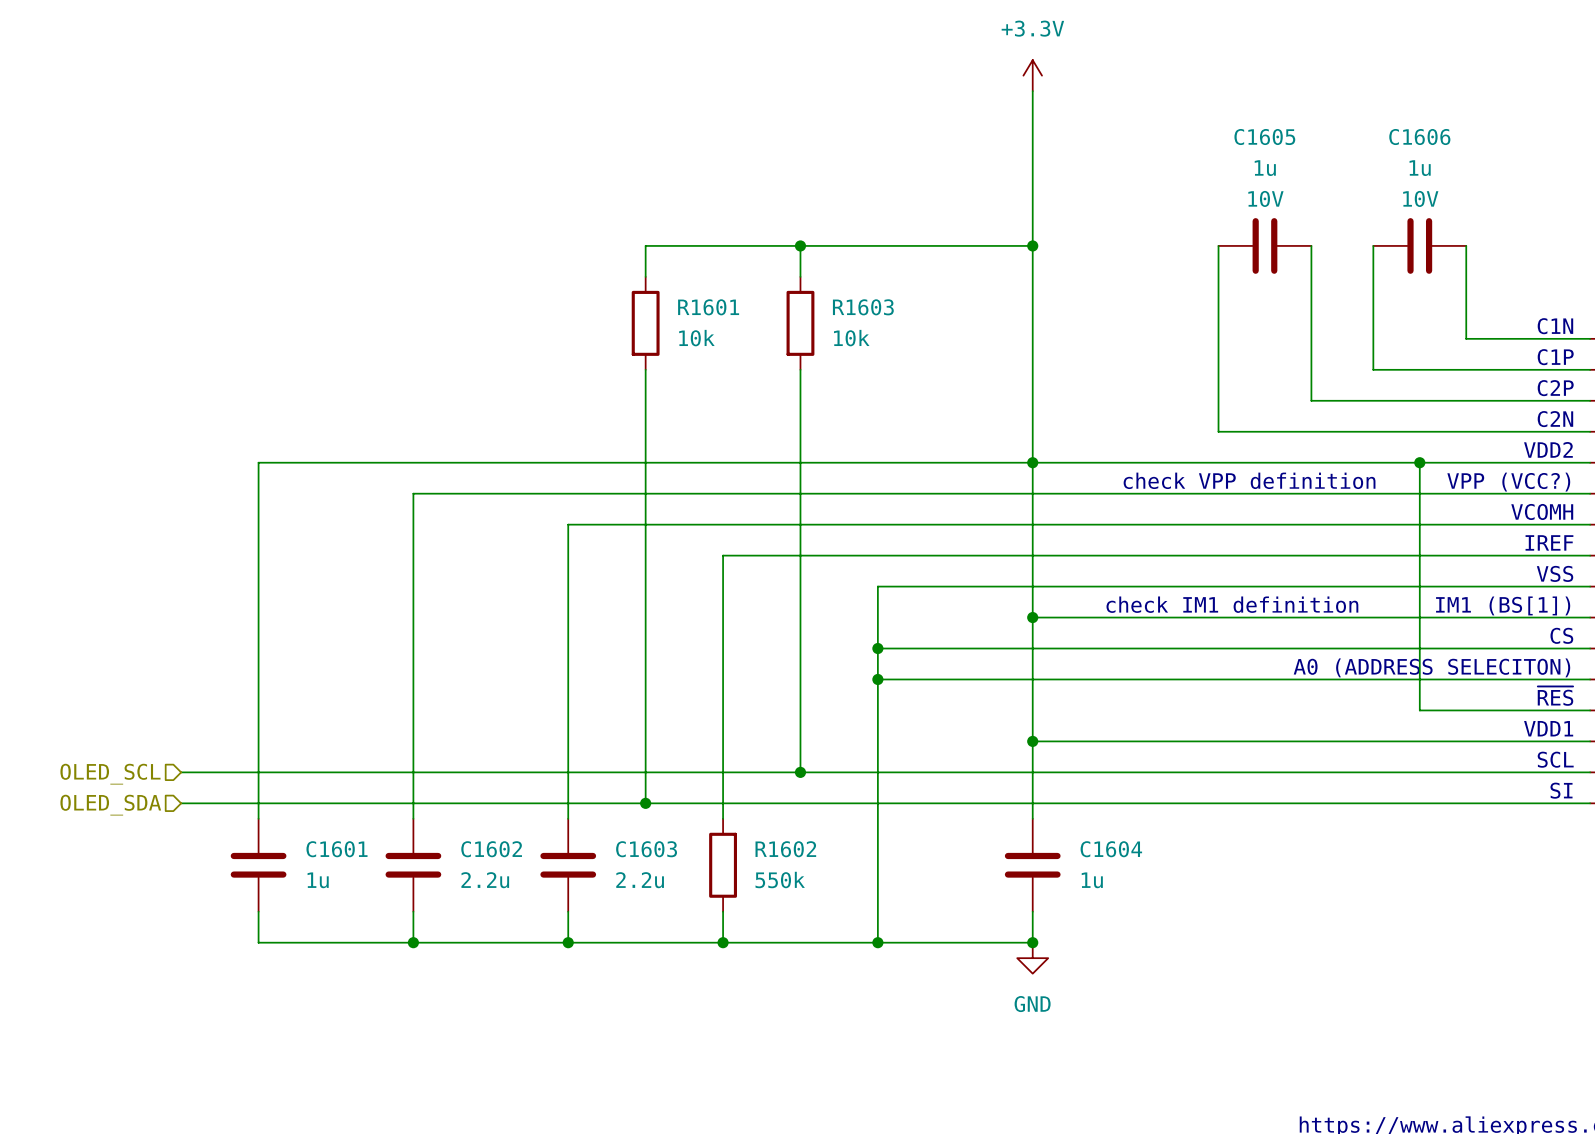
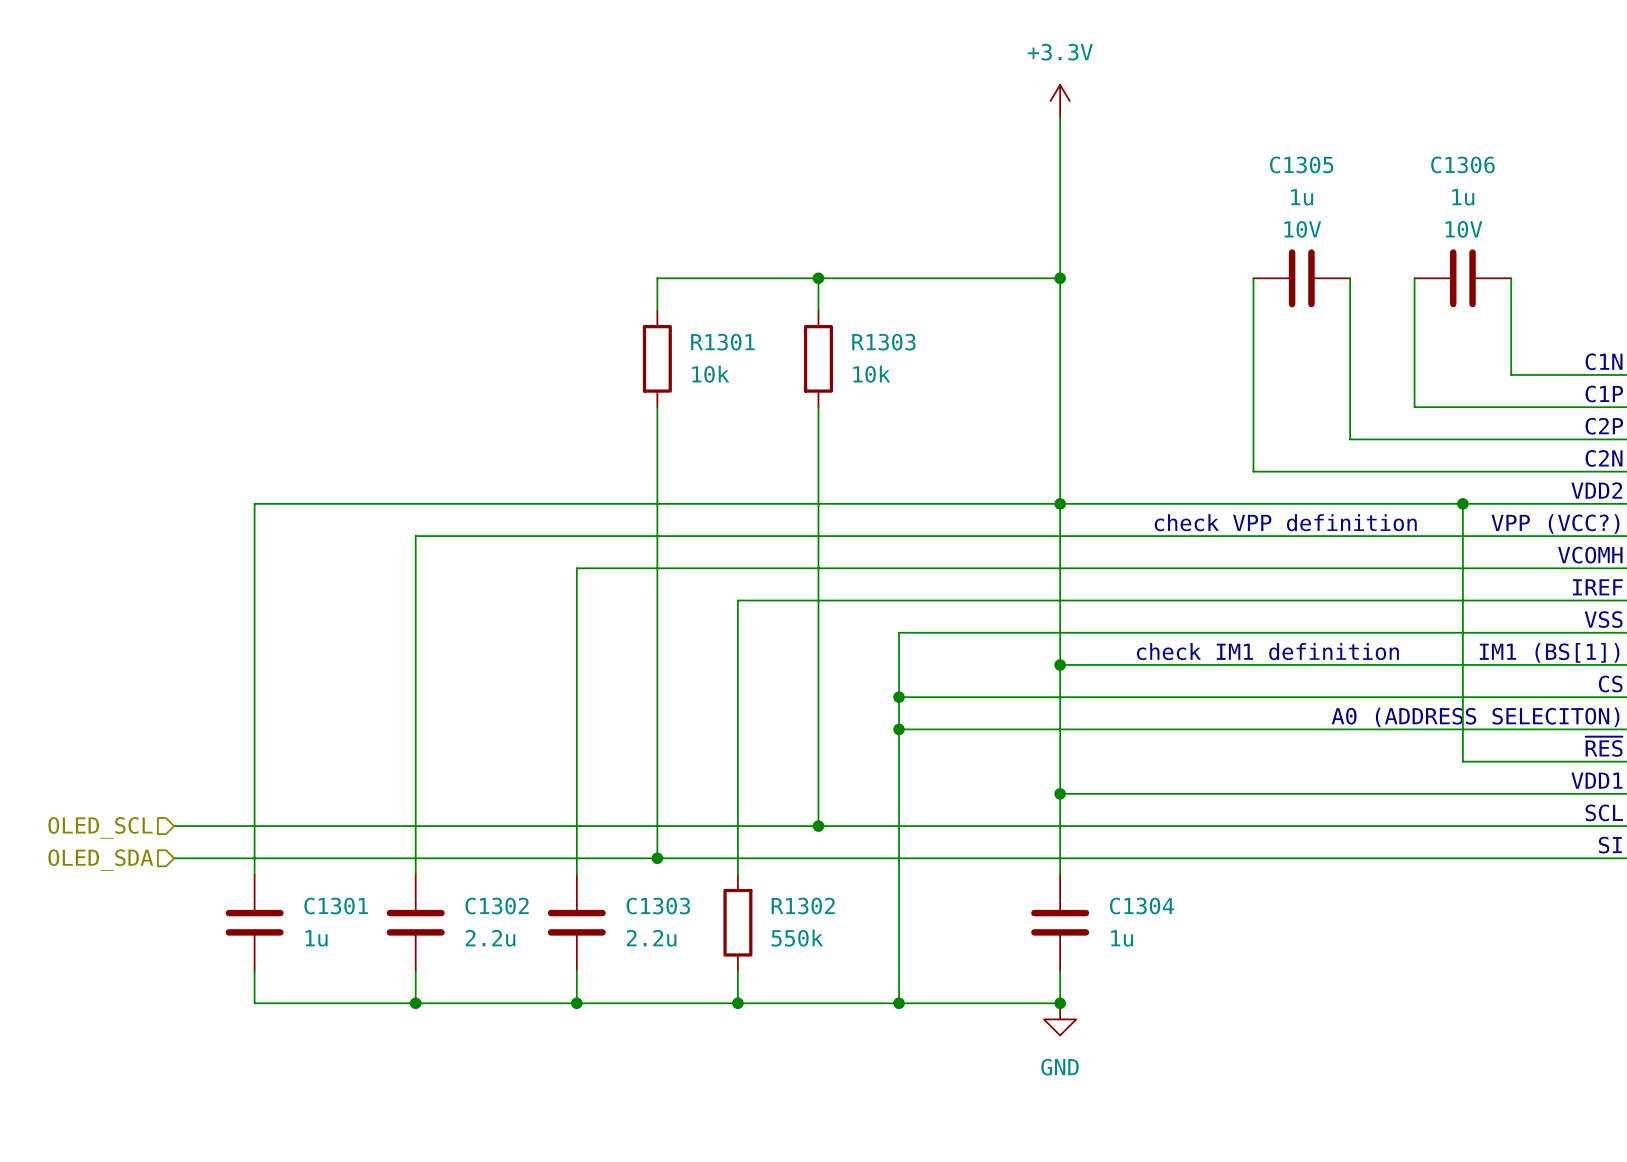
C1605 name: C1605 (1264, 137) -> C1305 (1301, 164)
C1606 name: C1606 (1419, 137) -> C1306 (1462, 164)
R1601 name: R1601 (708, 307) -> R1301 (722, 342)
R1603 name: R1603 (863, 307) -> R1303 (883, 342)
C1601 name: C1601 (336, 849) -> C1301 (336, 906)
C1602 name: C1602 (491, 849) -> C1302 (497, 906)
C1603 name: C1603 (646, 849) -> C1303 (658, 906)
R1602 name: R1602 (785, 849) -> R1302 (803, 906)
C1604 name: C1604 (1111, 849) -> C1304 (1141, 906)

